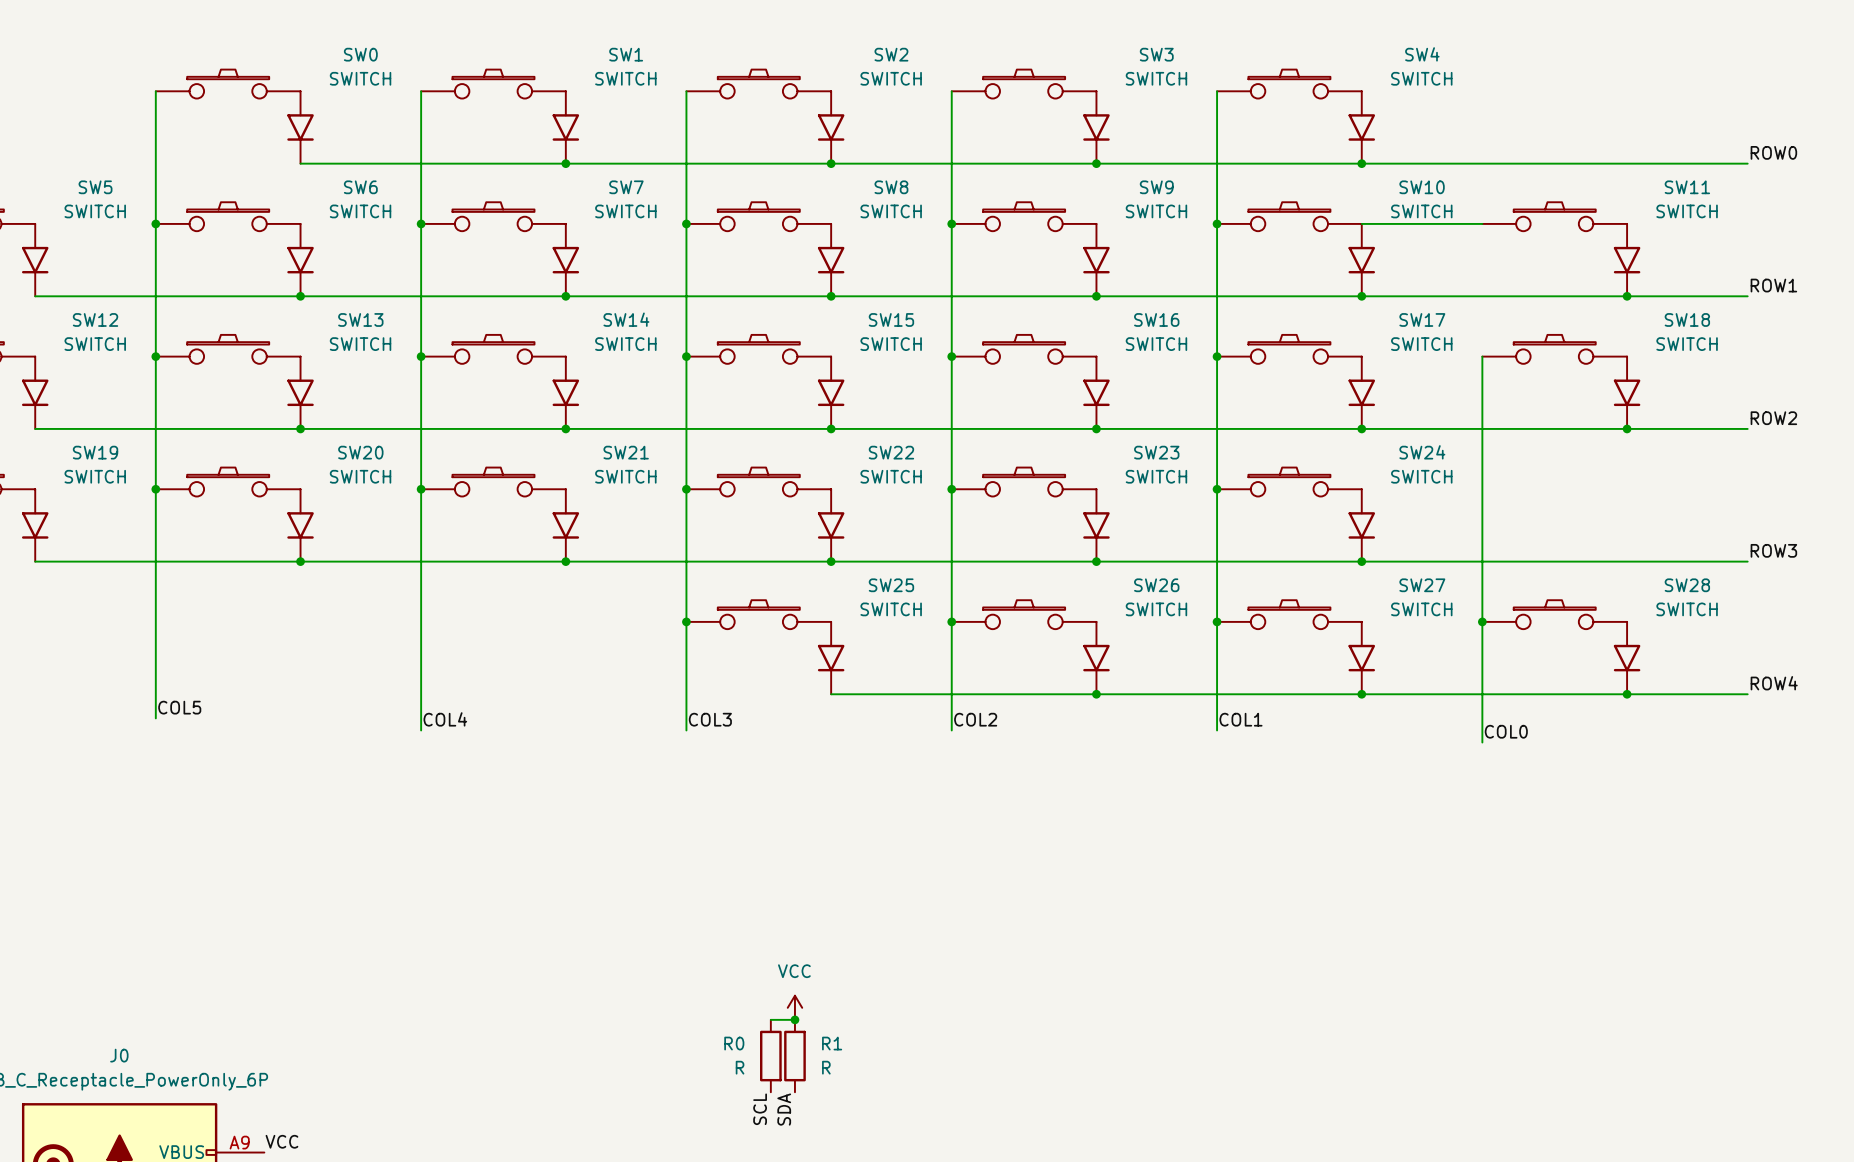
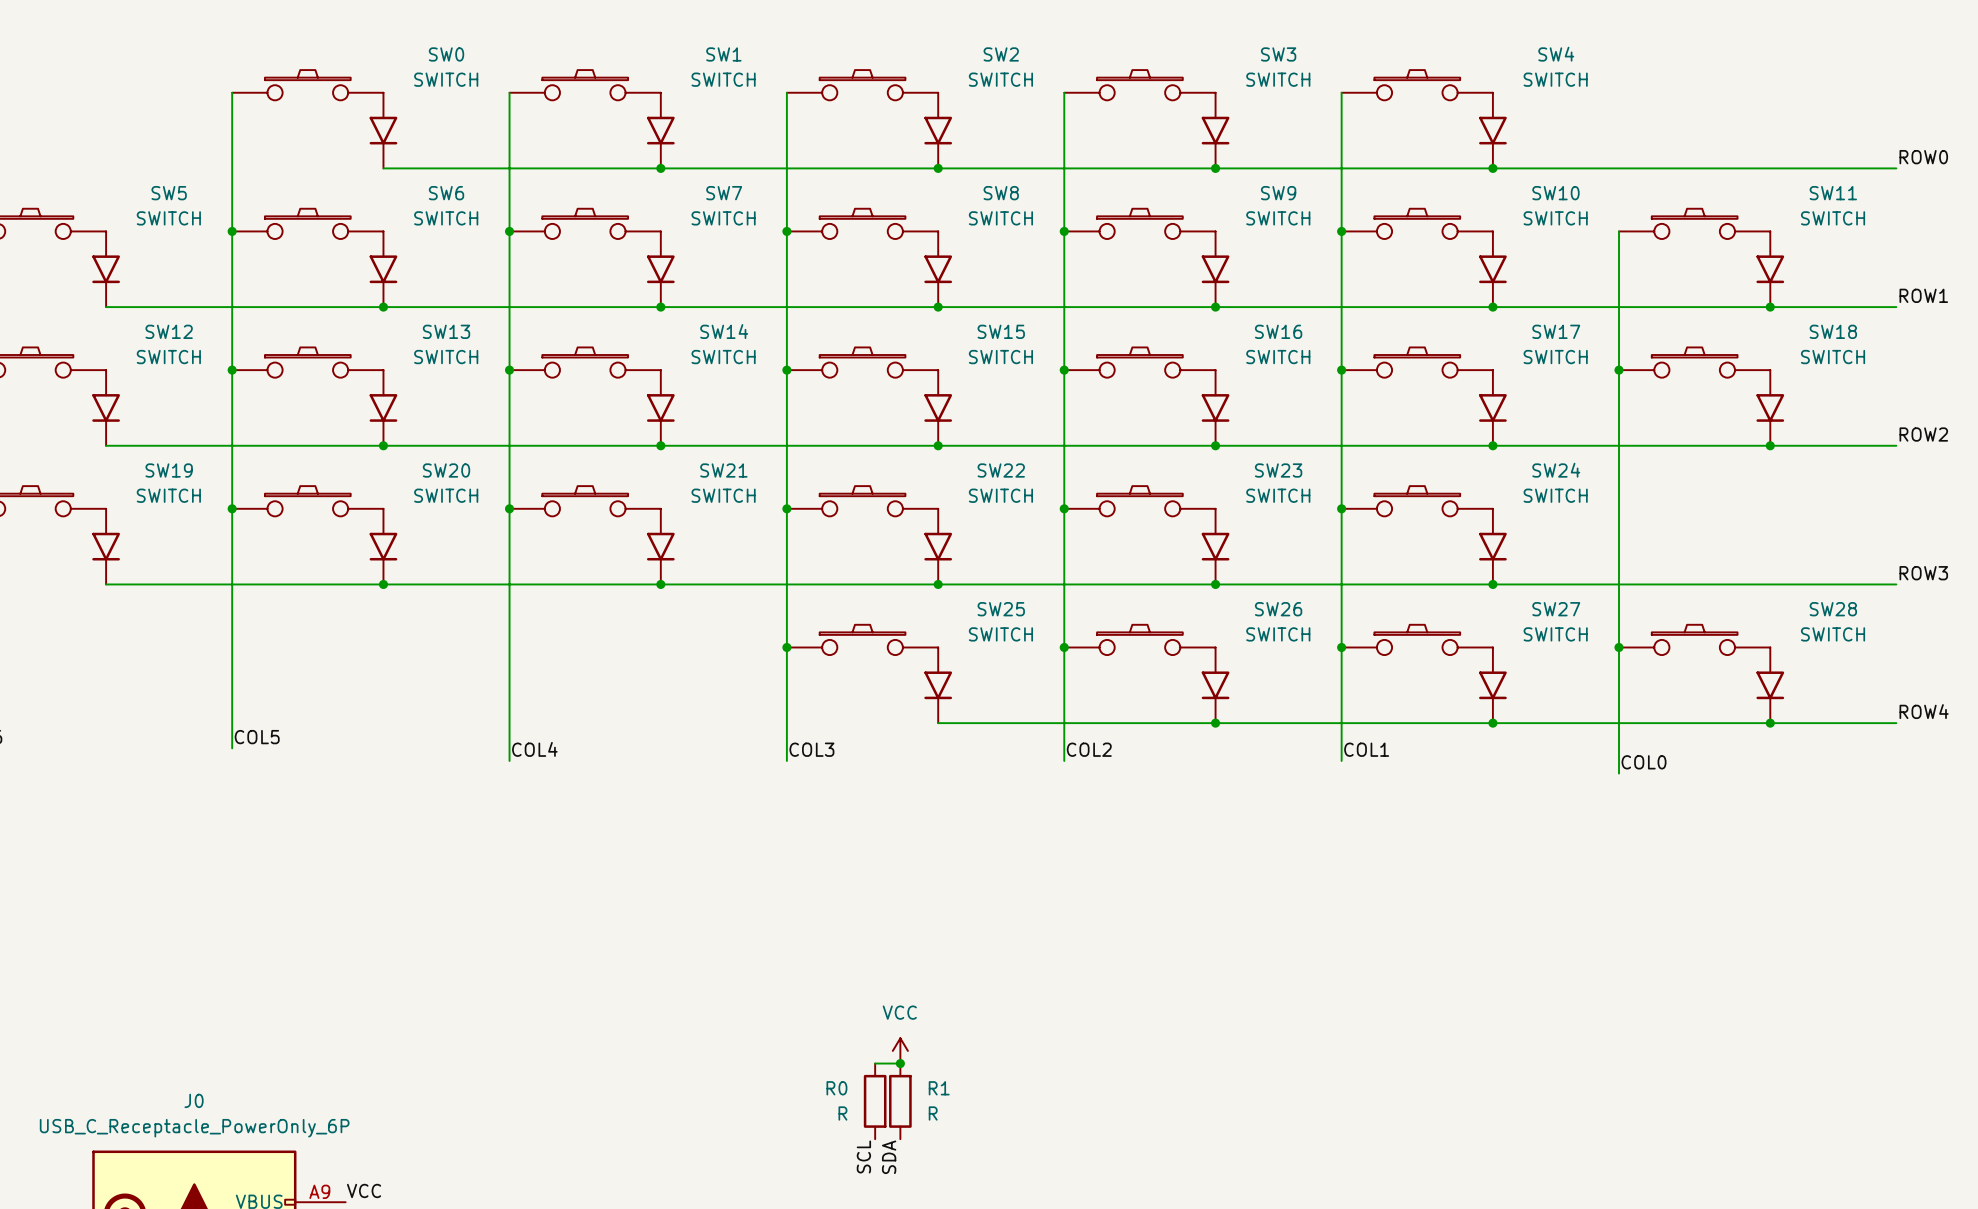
wire: (1361, 223) (1482, 223) -> (1619, 370) (1619, 231)
junction: none -> (1619, 370)

